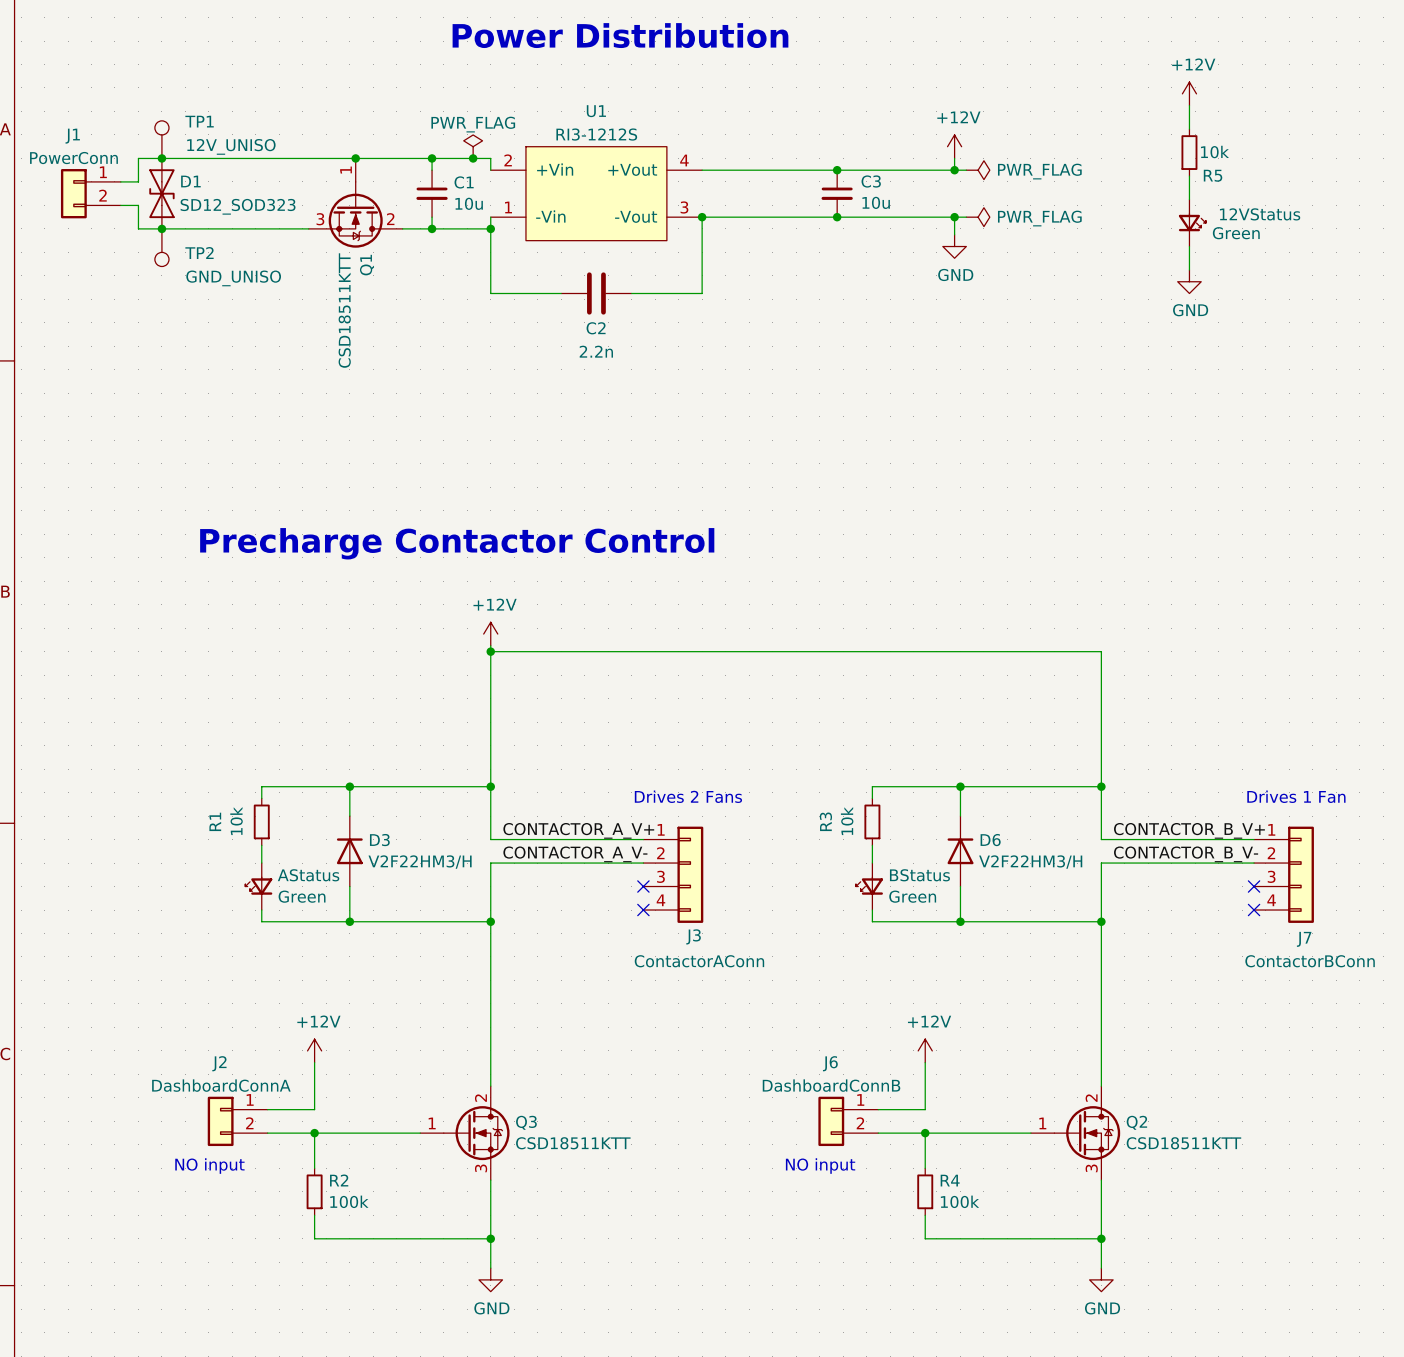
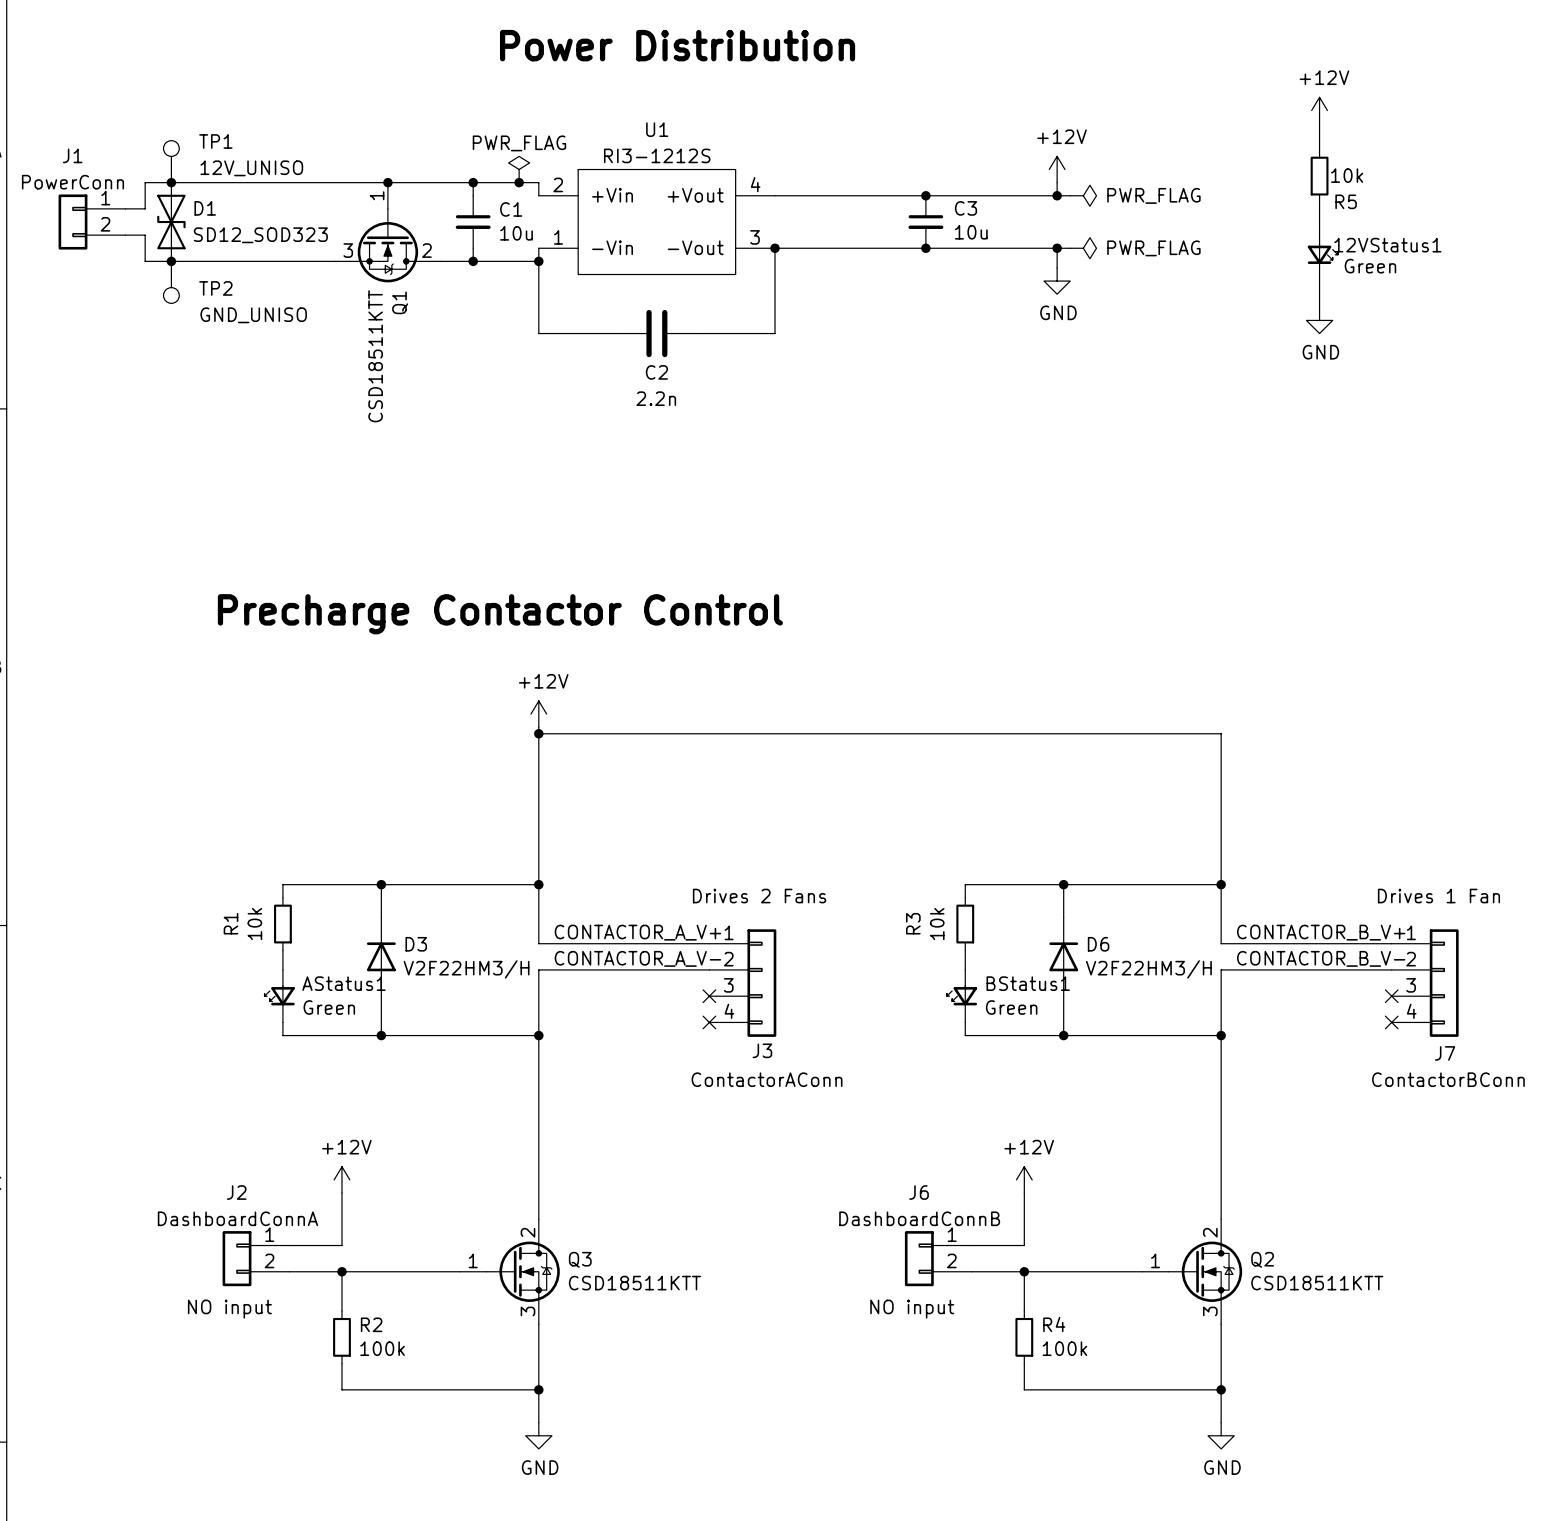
12VStatus name: 12VStatus (1260, 214) -> 12VStatus1 (1387, 245)
AStatus name: AStatus (308, 875) -> AStatus1 (343, 983)
BStatus name: BStatus (919, 875) -> BStatus1 (1028, 983)

